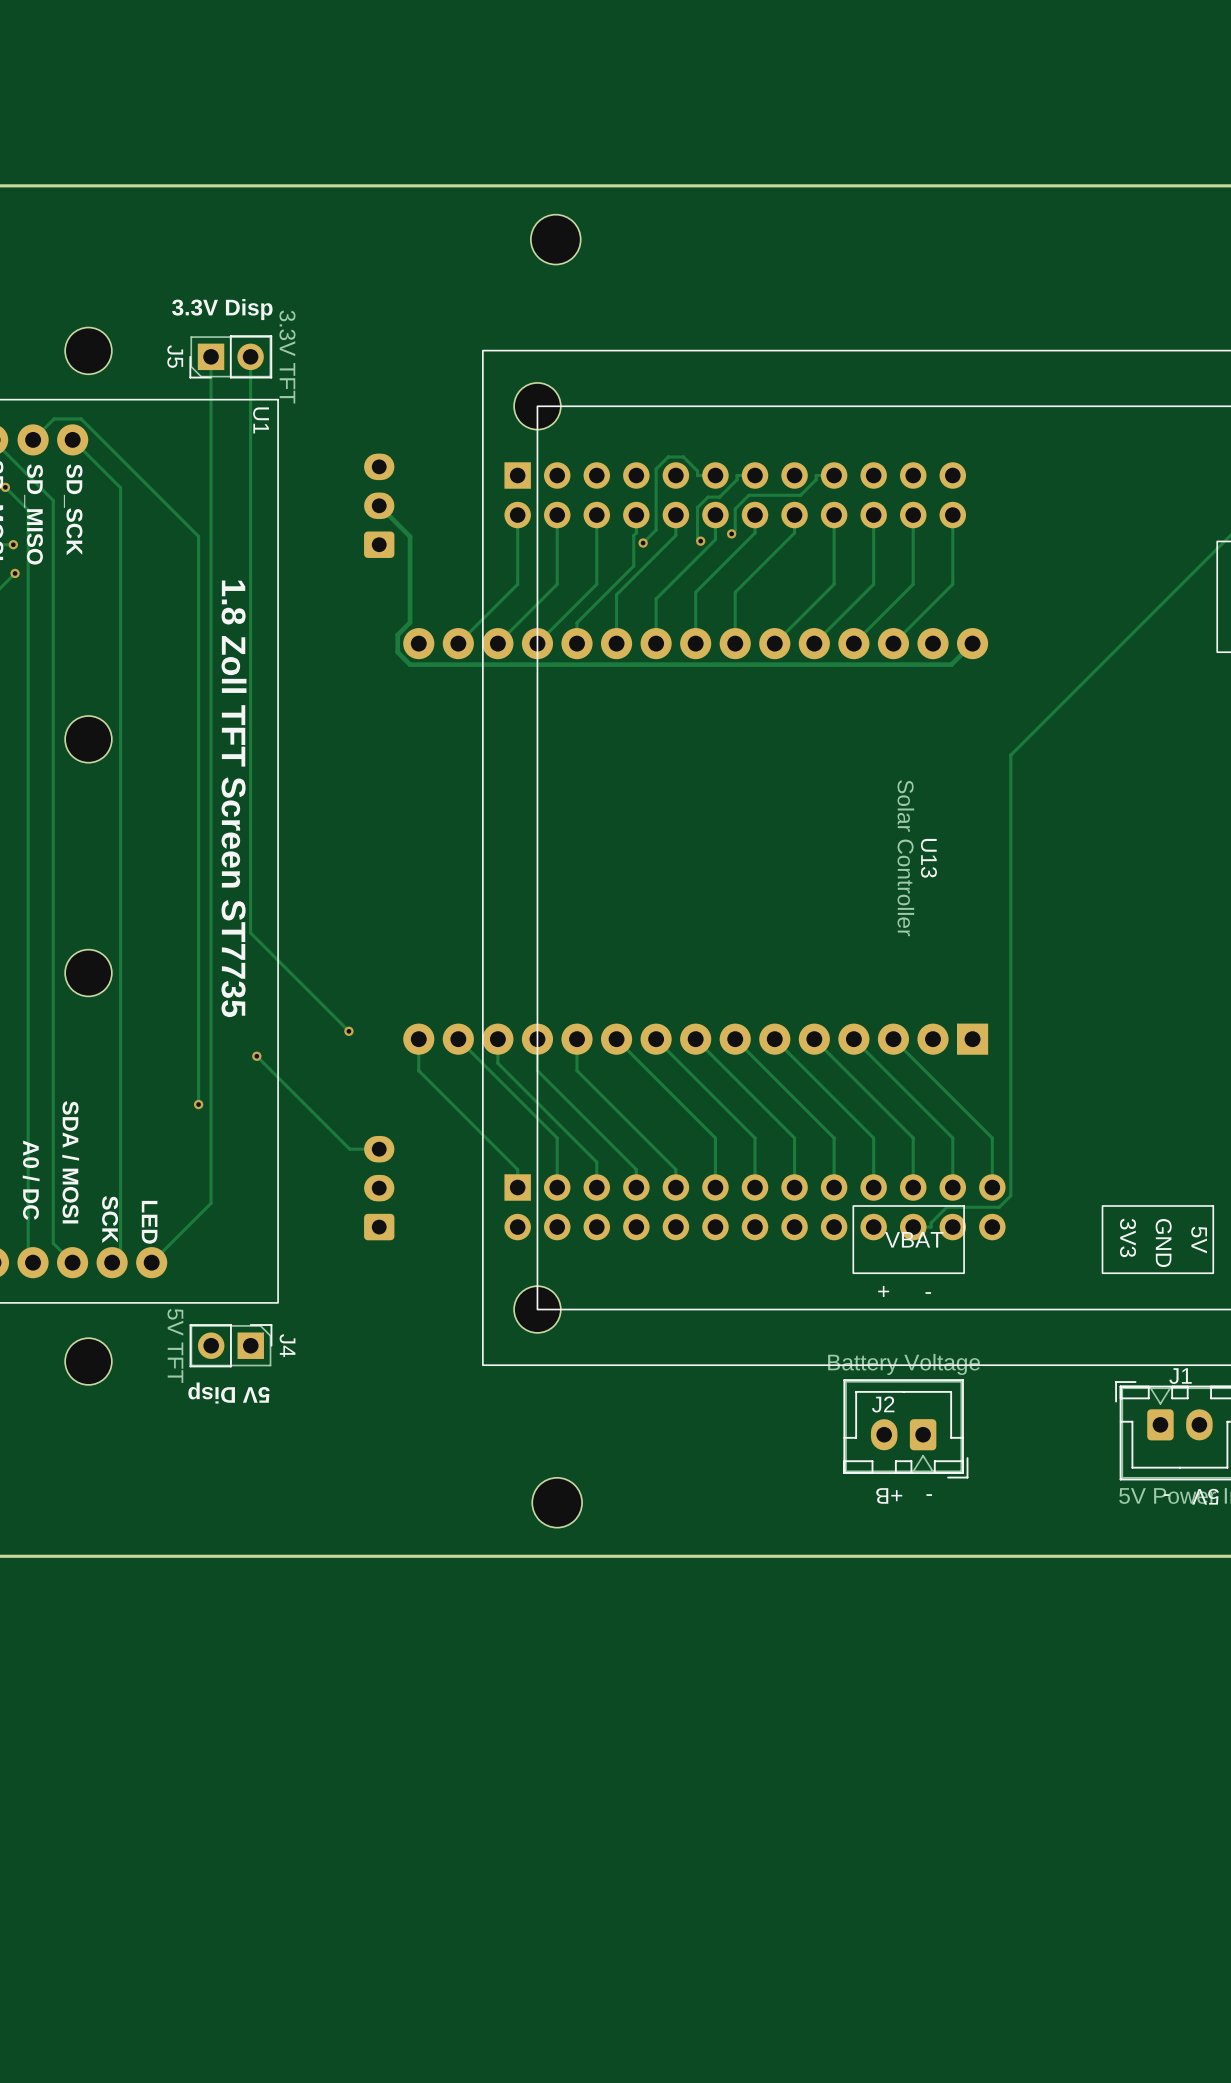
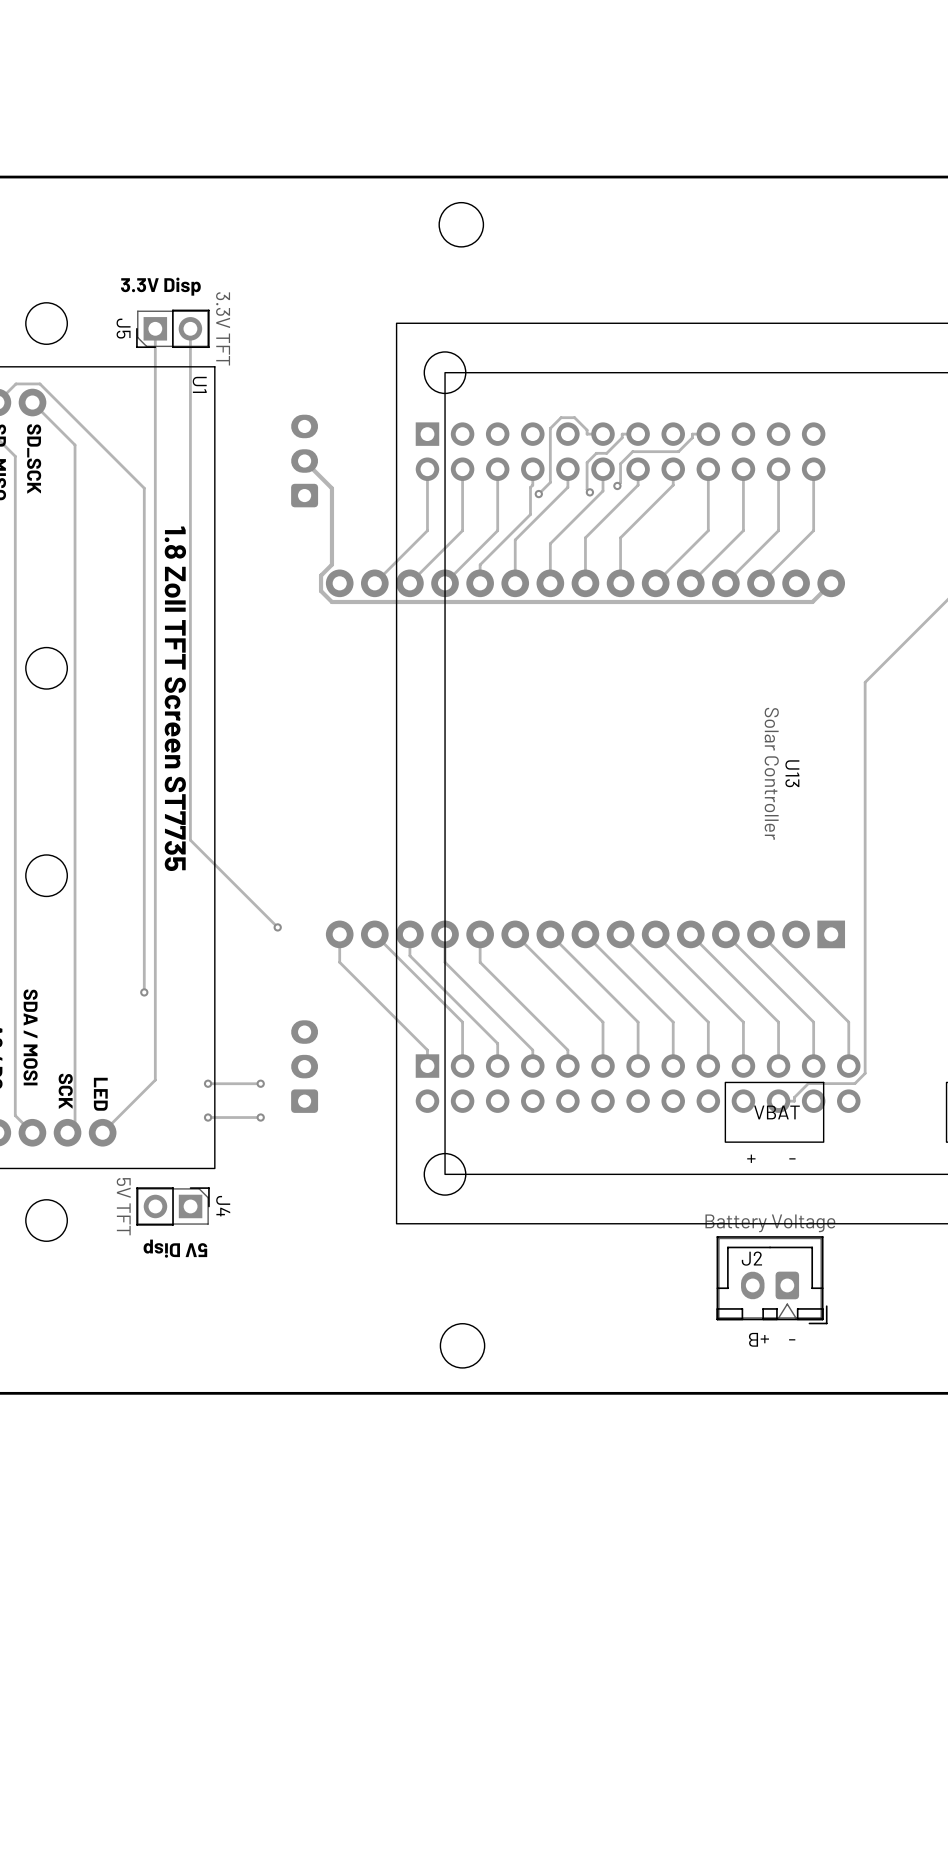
track: (256, 1056) (349, 1149) (379, 1149) -> none
via: (256, 1056) -> none
via: none -> (208, 1083)
track: none -> (260, 1083) (208, 1083)
via: none -> (260, 1083)
via: none -> (208, 1117)
track: none -> (260, 1117) (208, 1117)
via: none -> (260, 1117)

